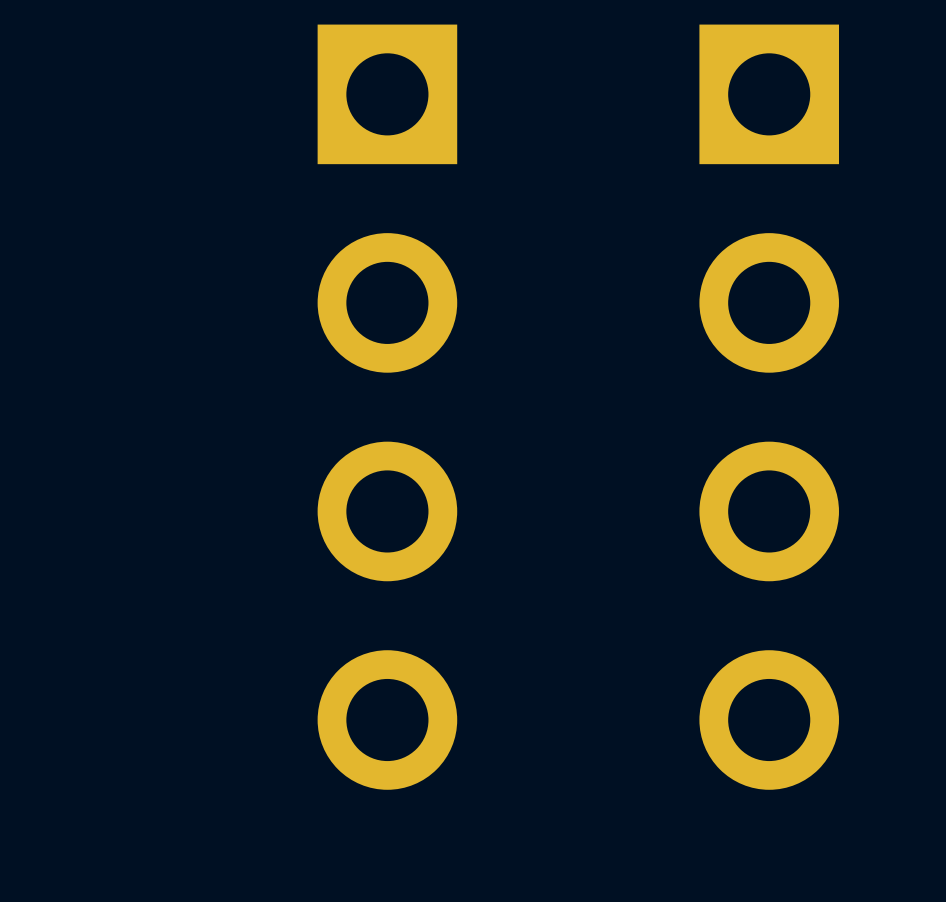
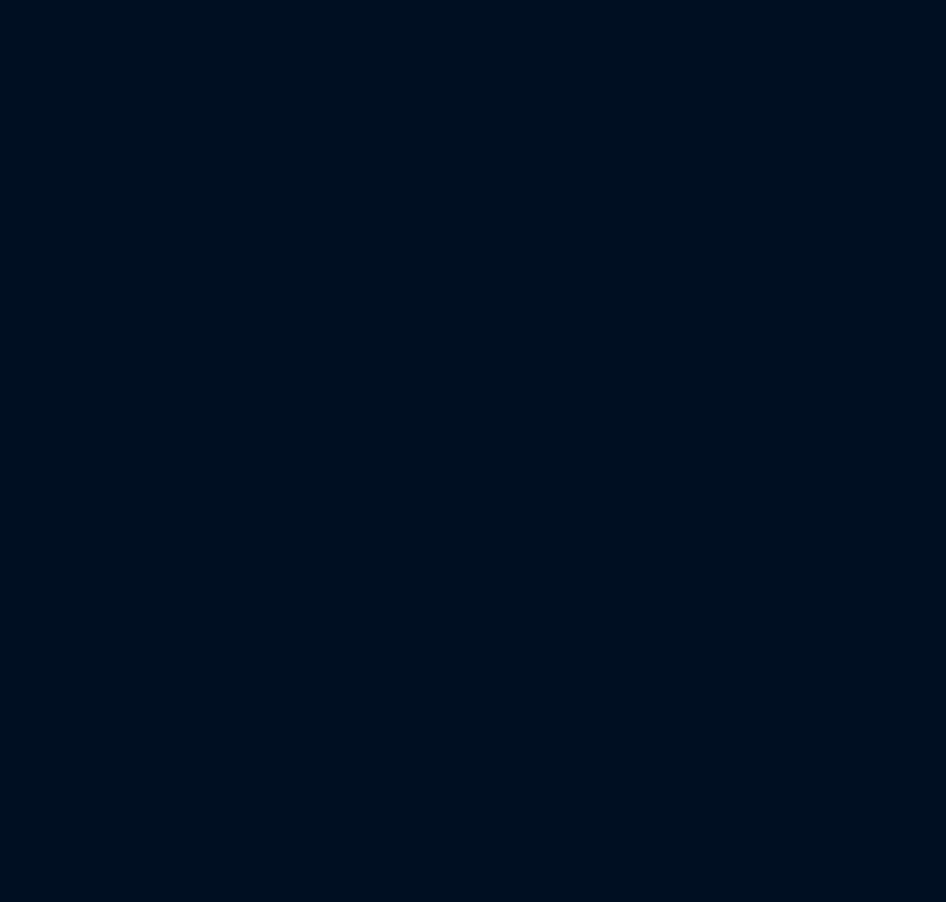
part: (387, 407) -> none
part: (769, 407) -> none

